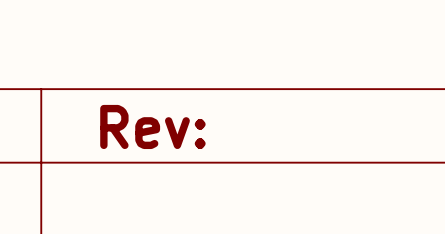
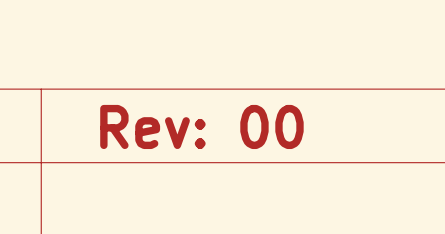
title block: Rev: (152, 126) -> Rev: 00 (201, 126)

